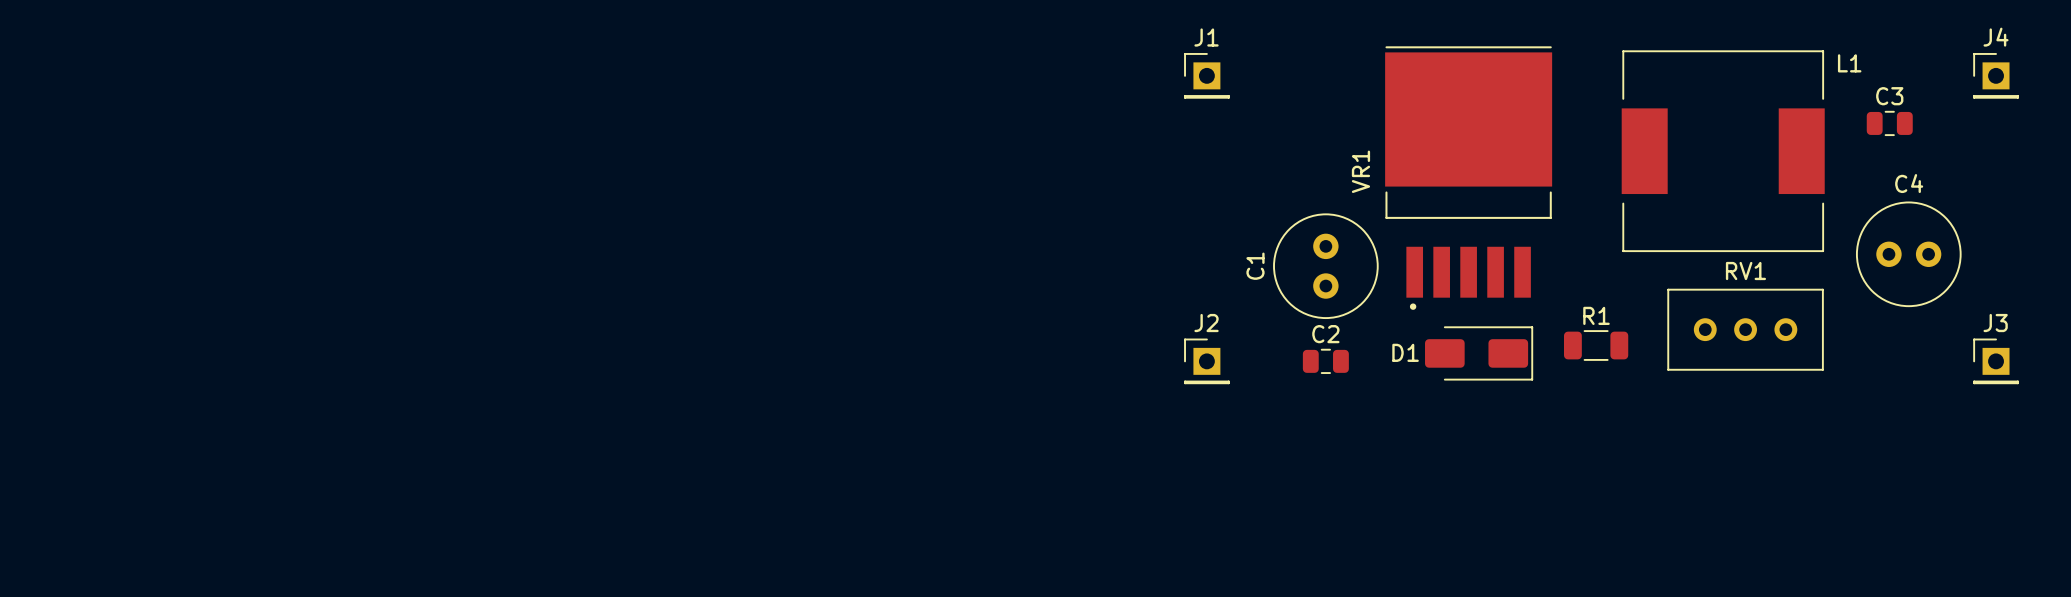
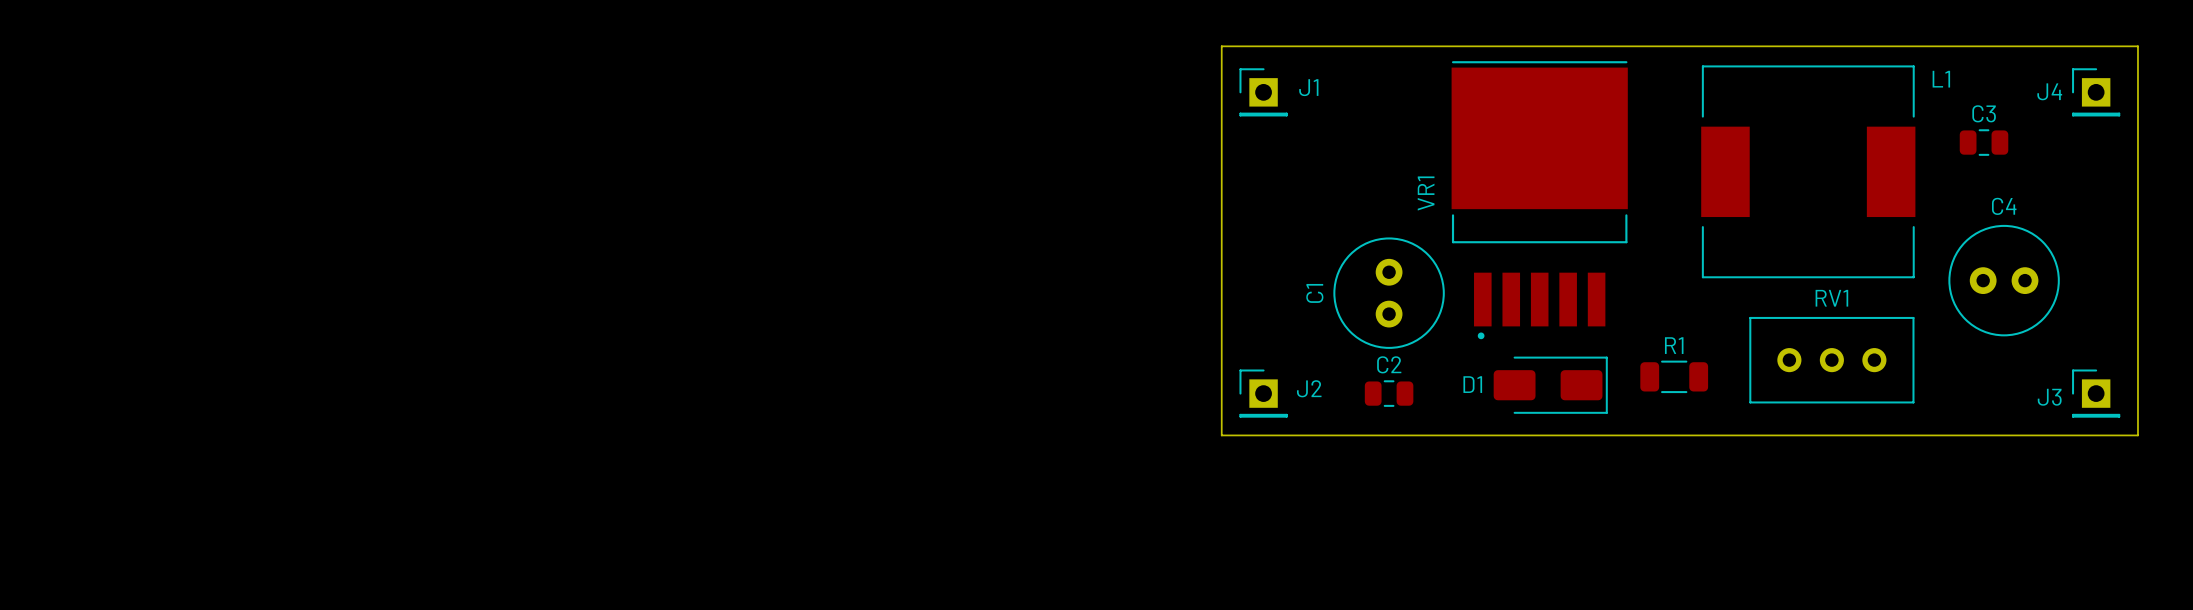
board edge: none -> (1221, 46) (2137, 46) (2137, 435) (1221, 435) (1221, 46)
J1 name position: J1 (1206, 37) -> J1 (1308, 87)
J4 name position: J4 (1996, 37) -> J4 (2049, 91)
J2 name position: J2 (1206, 323) -> J2 (1309, 388)
J3 name position: J3 (1995, 323) -> J3 (2049, 397)

